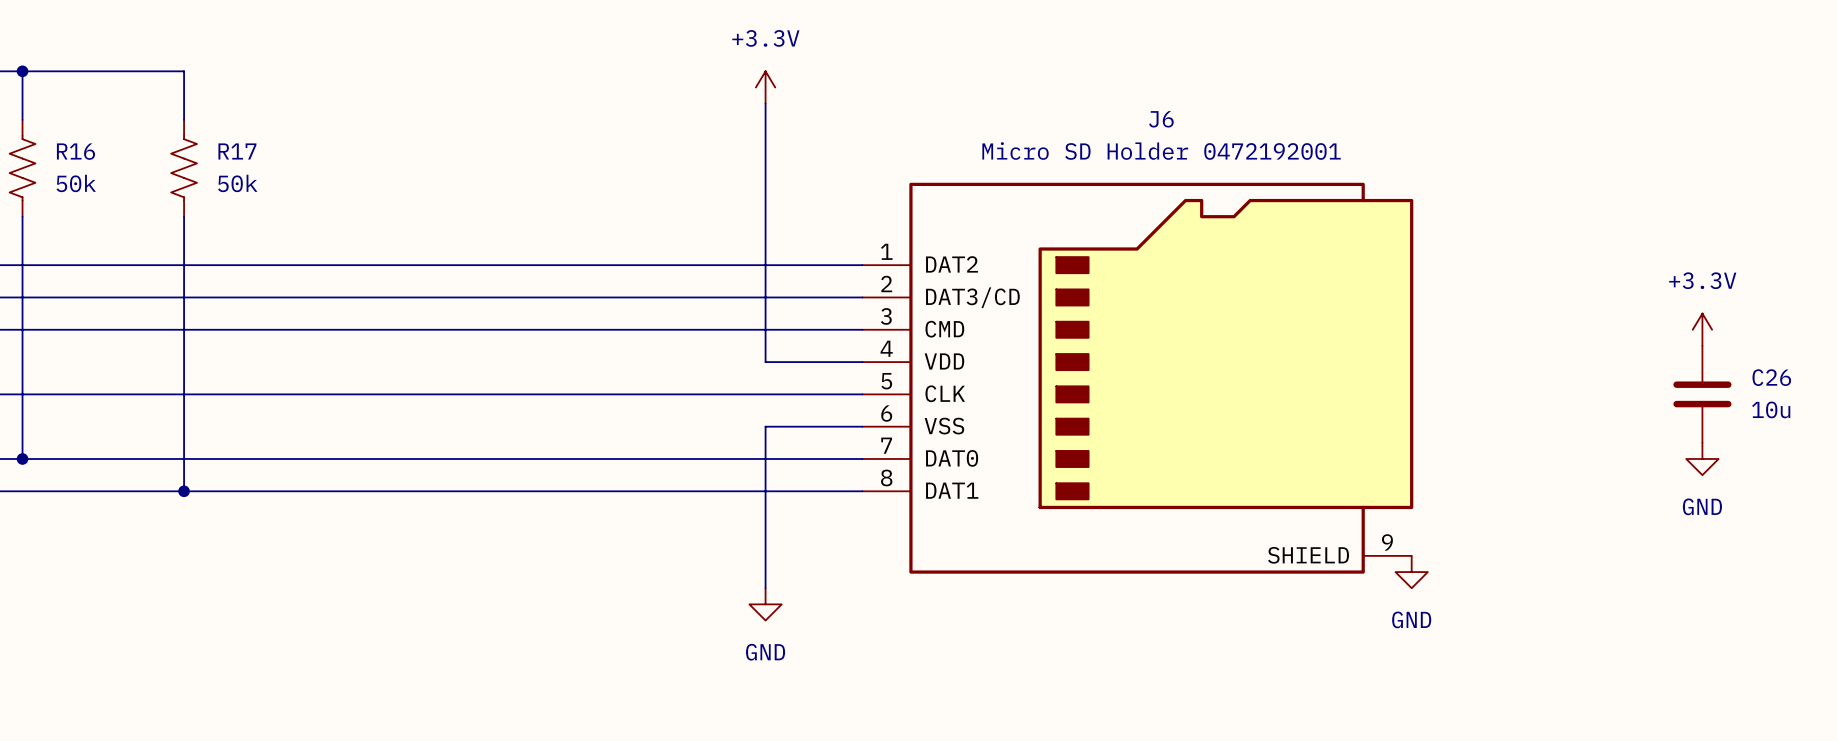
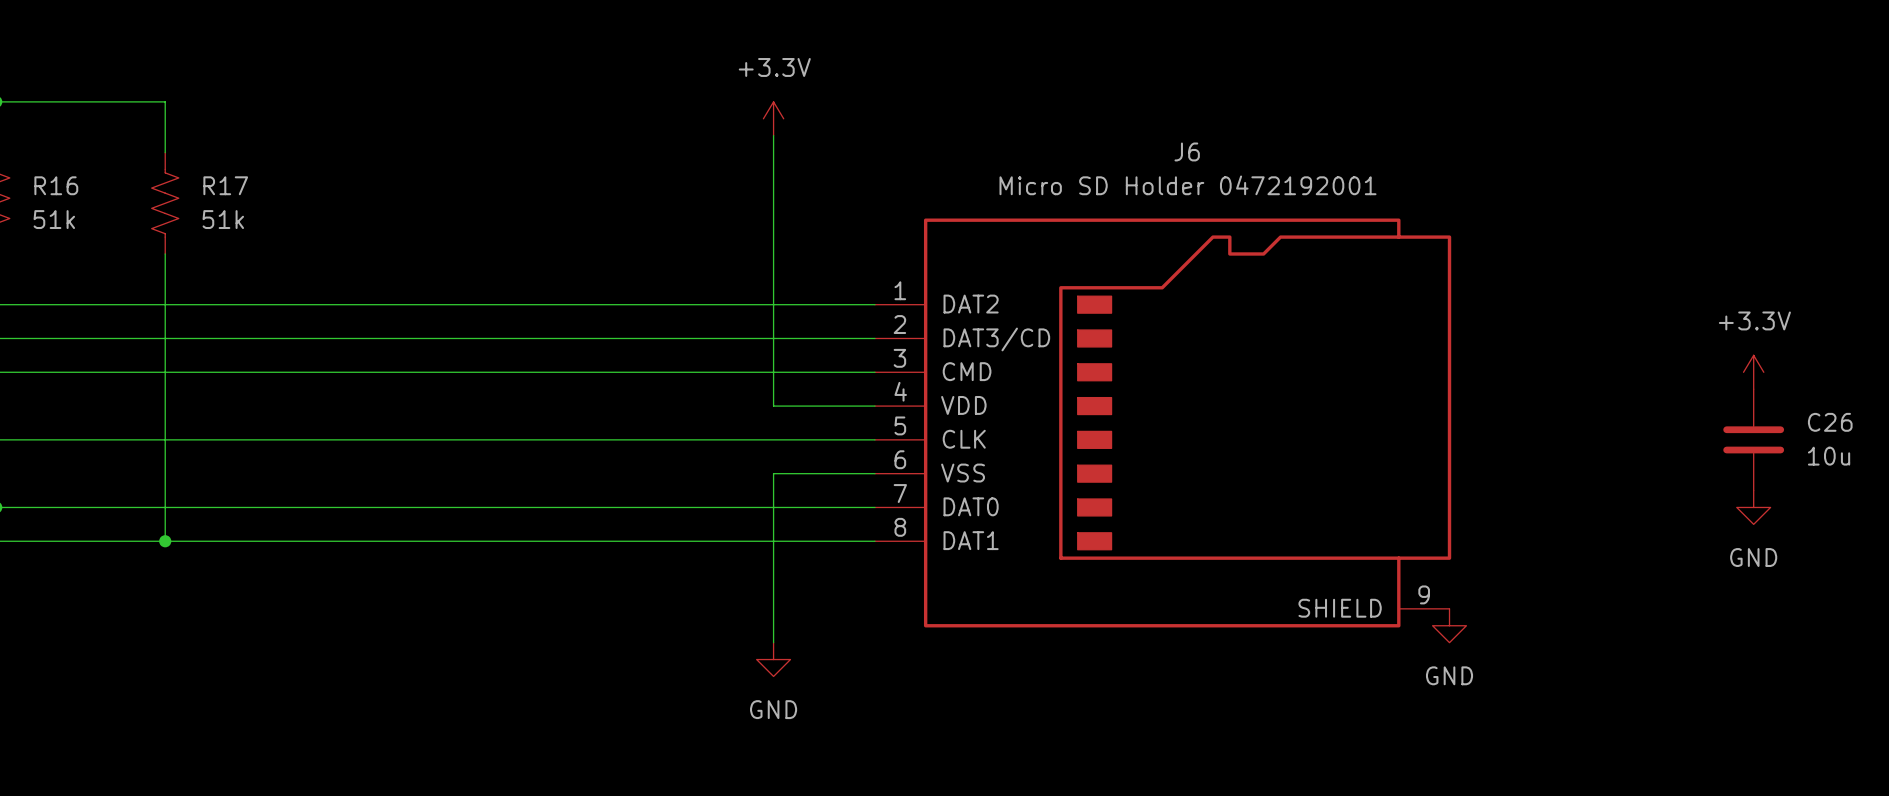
R16 value: 50k (76, 183) -> 51k (54, 219)
R17 value: 50k (237, 183) -> 51k (223, 219)

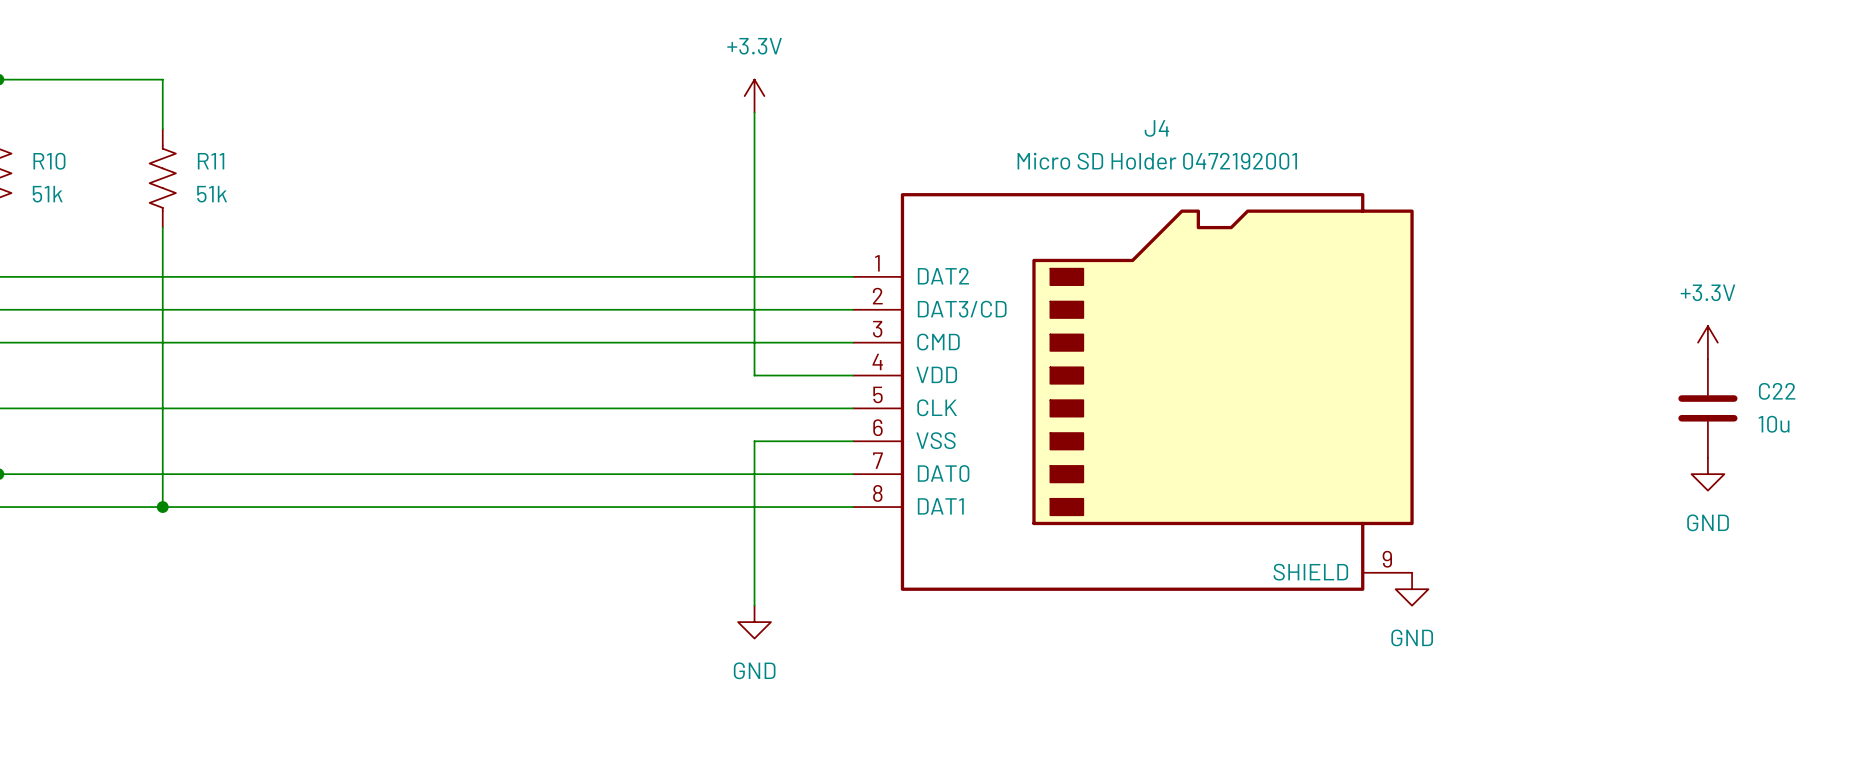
J6 name: J6 (1187, 151) -> J4 (1156, 128)
R16 name: R16 (56, 185) -> R10 (49, 161)
R17 name: R17 (225, 185) -> R11 (211, 161)
C26 name: C26 (1830, 422) -> C22 (1777, 391)

